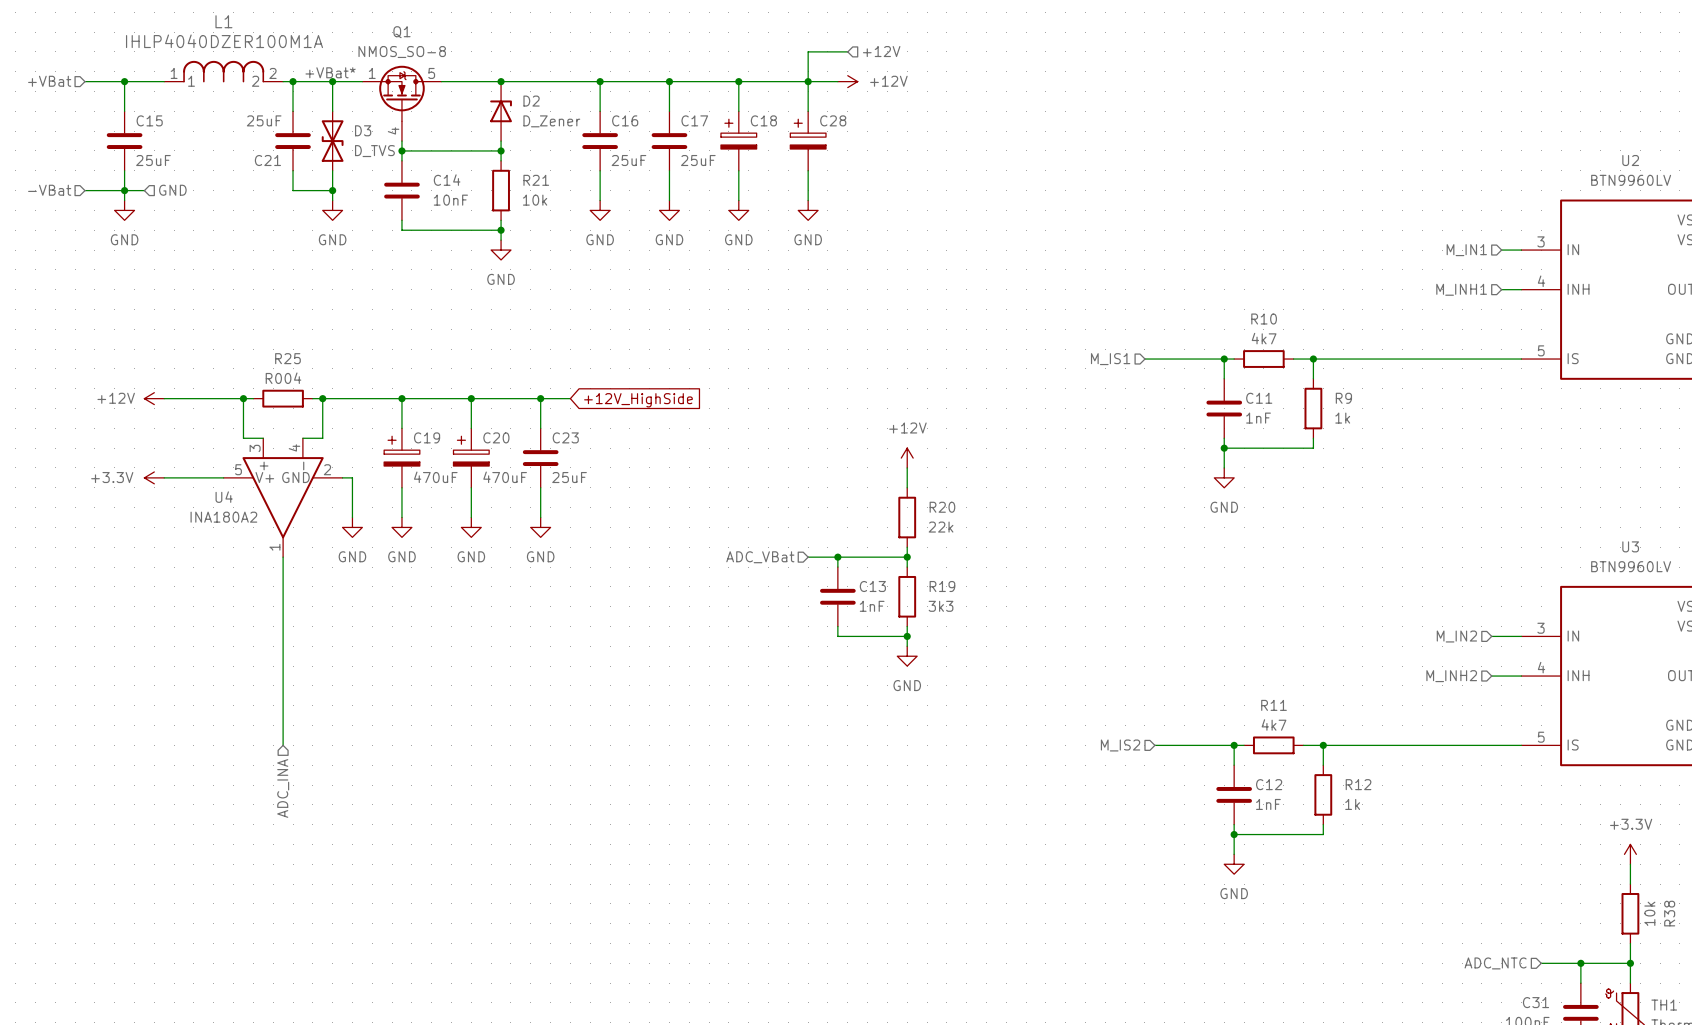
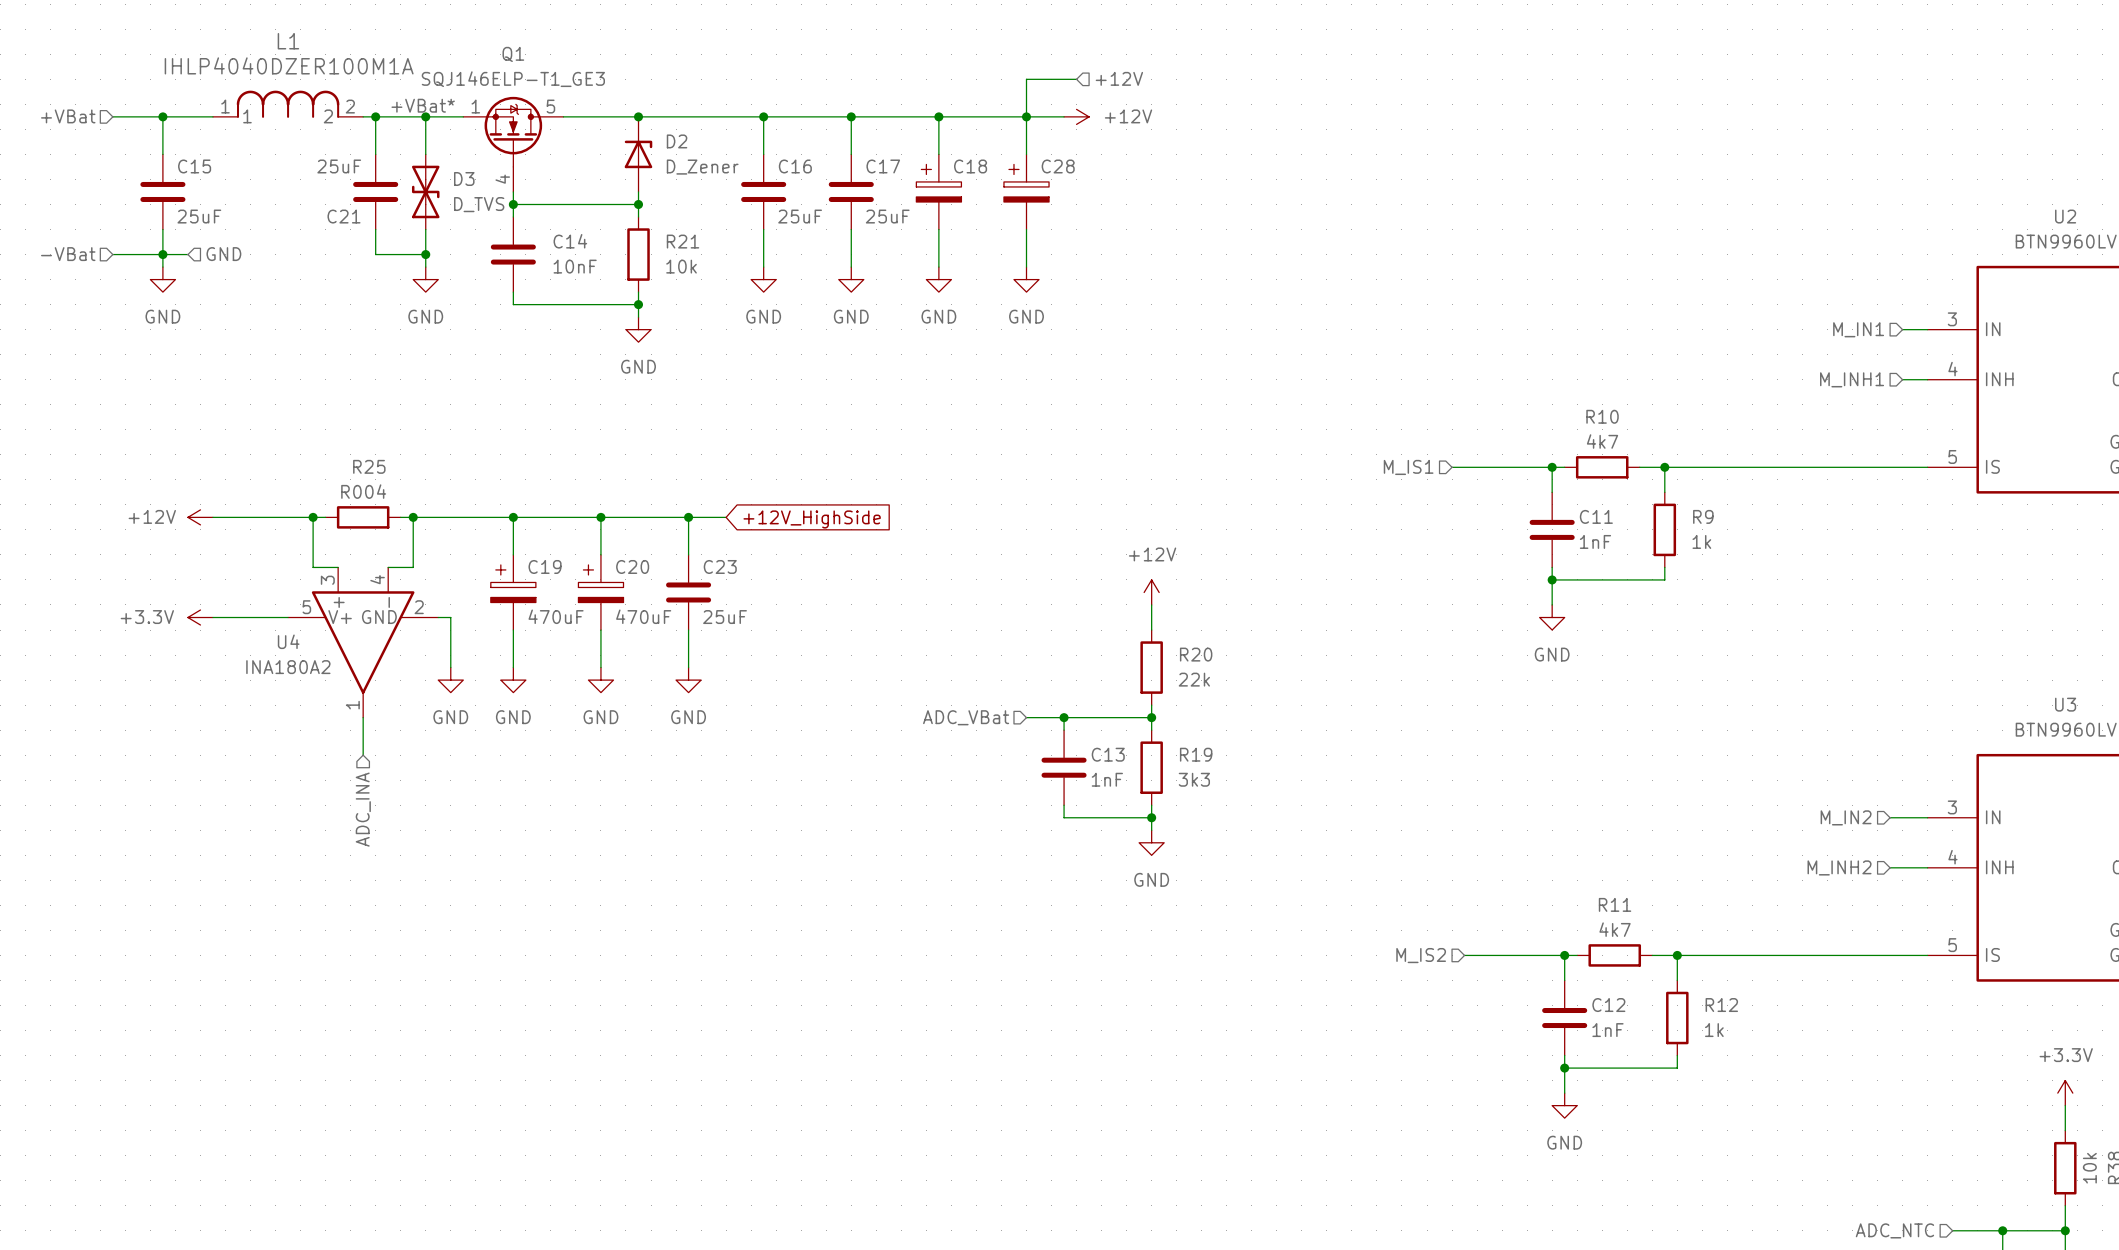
Q1 value: NMOS_SO-8 (402, 52) -> SQJ146ELP-T1_GE3 (513, 79)
wire: (283, 586) (283, 745) -> none
hierarchical label position: ADC_INA (283, 788) -> ADC_INA (363, 809)

